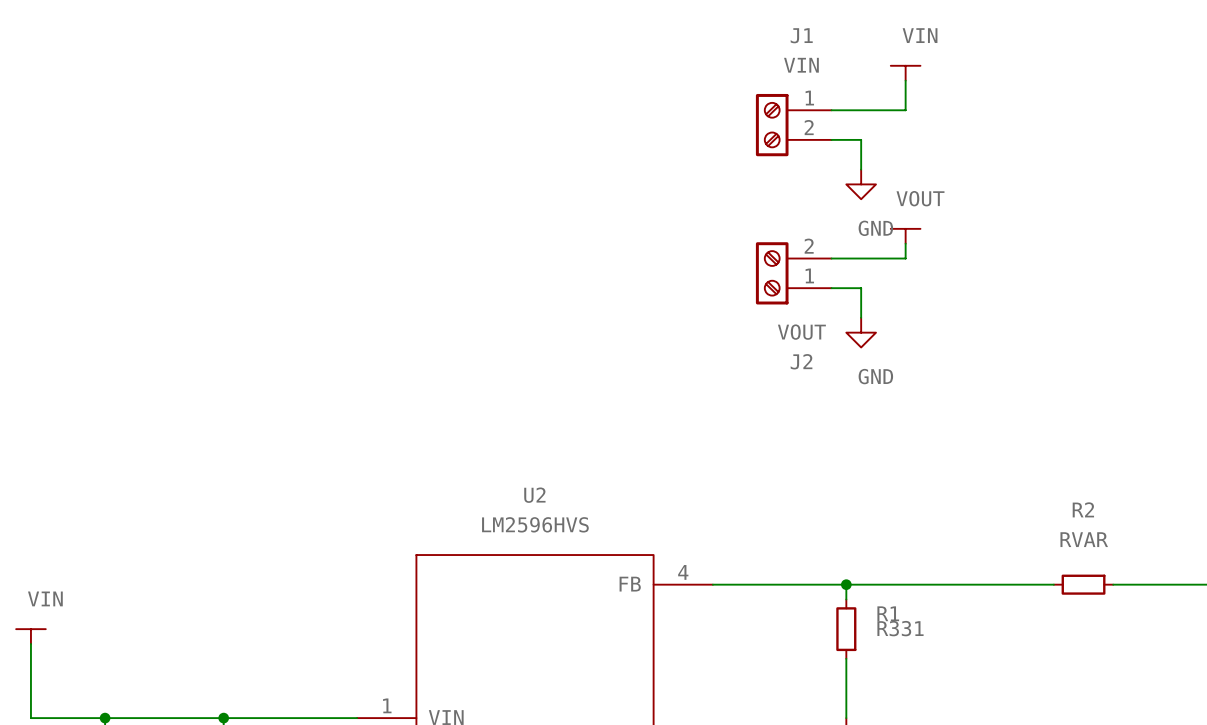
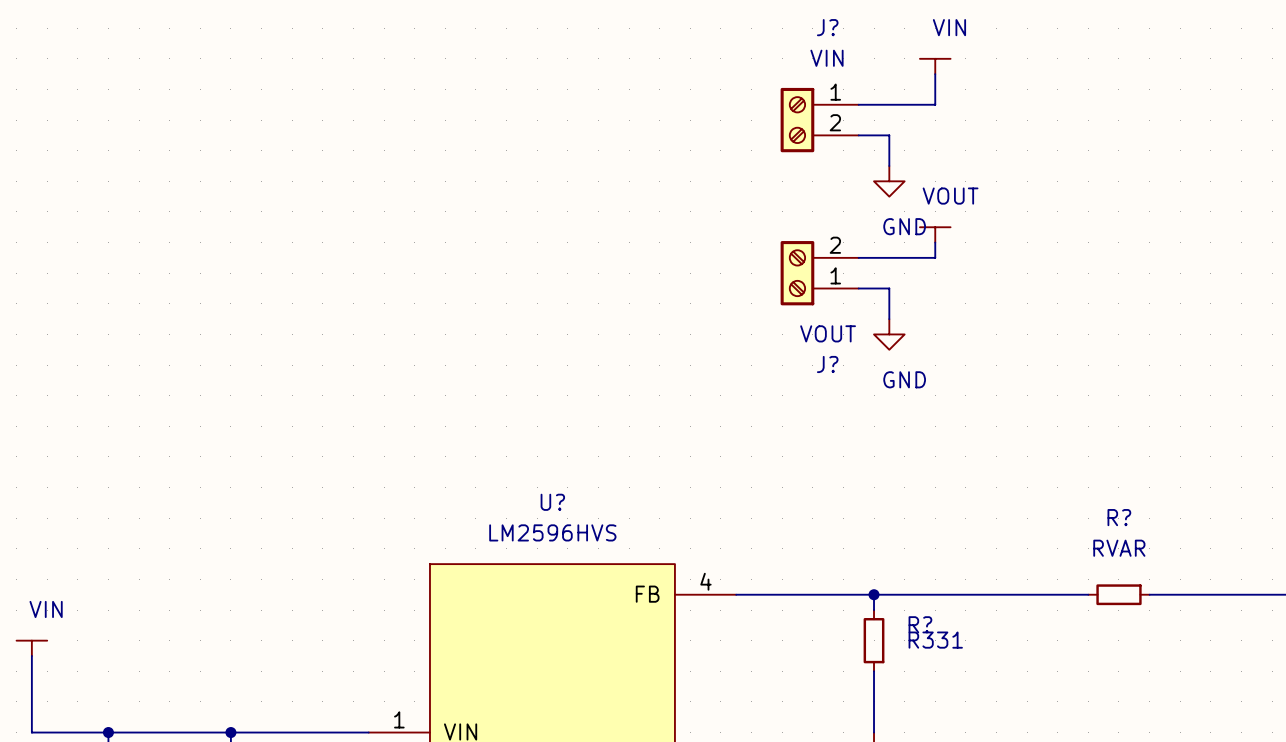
J1 name: J1 (801, 35) -> J? (827, 27)
J2 name: J2 (801, 361) -> J? (827, 364)
U2 name: U2 (534, 495) -> U? (552, 502)
R2 name: R2 (1083, 509) -> R? (1119, 517)
R1 name: R1 (888, 613) -> R? (920, 624)

